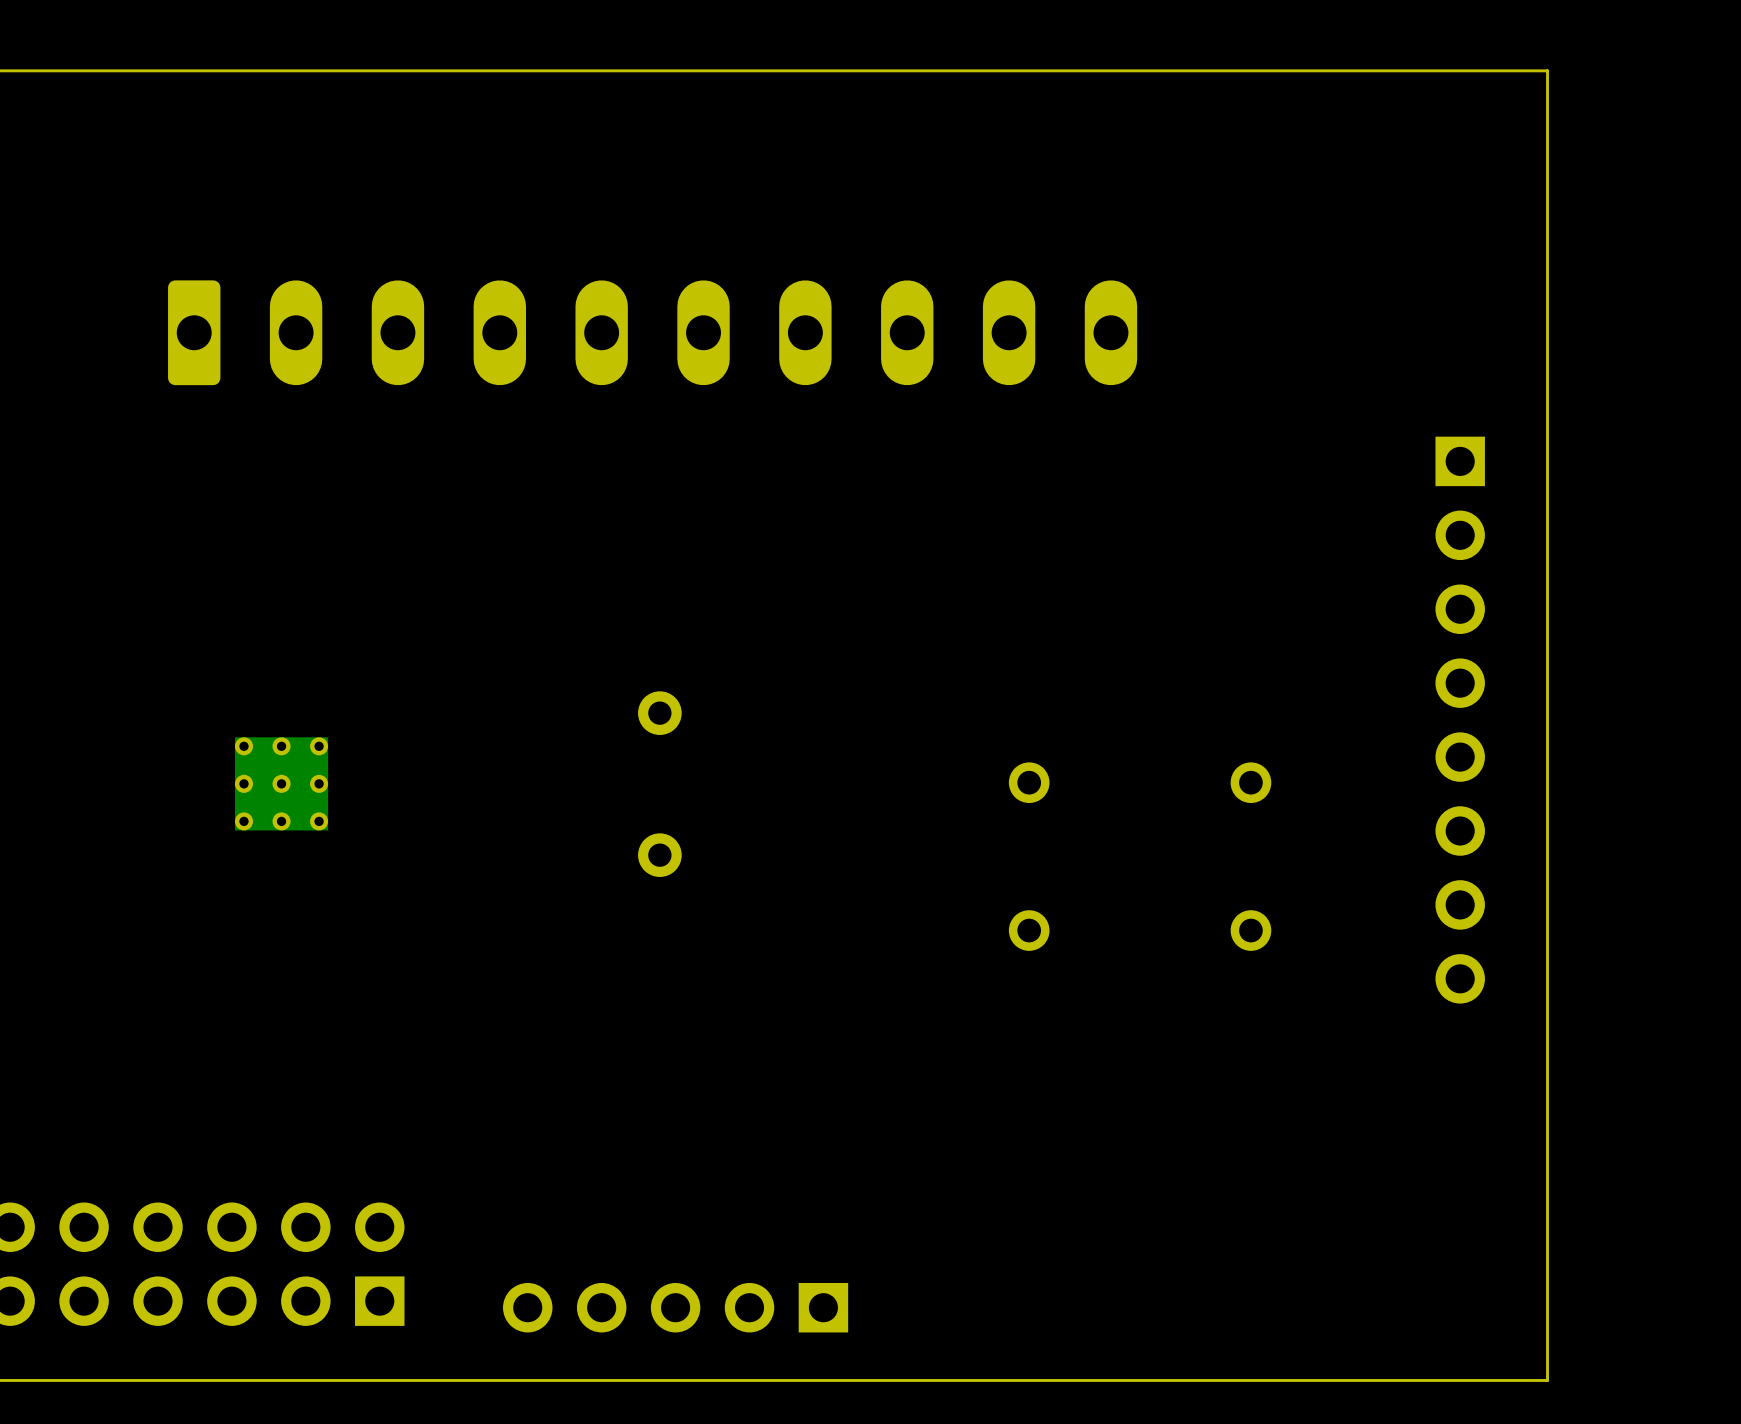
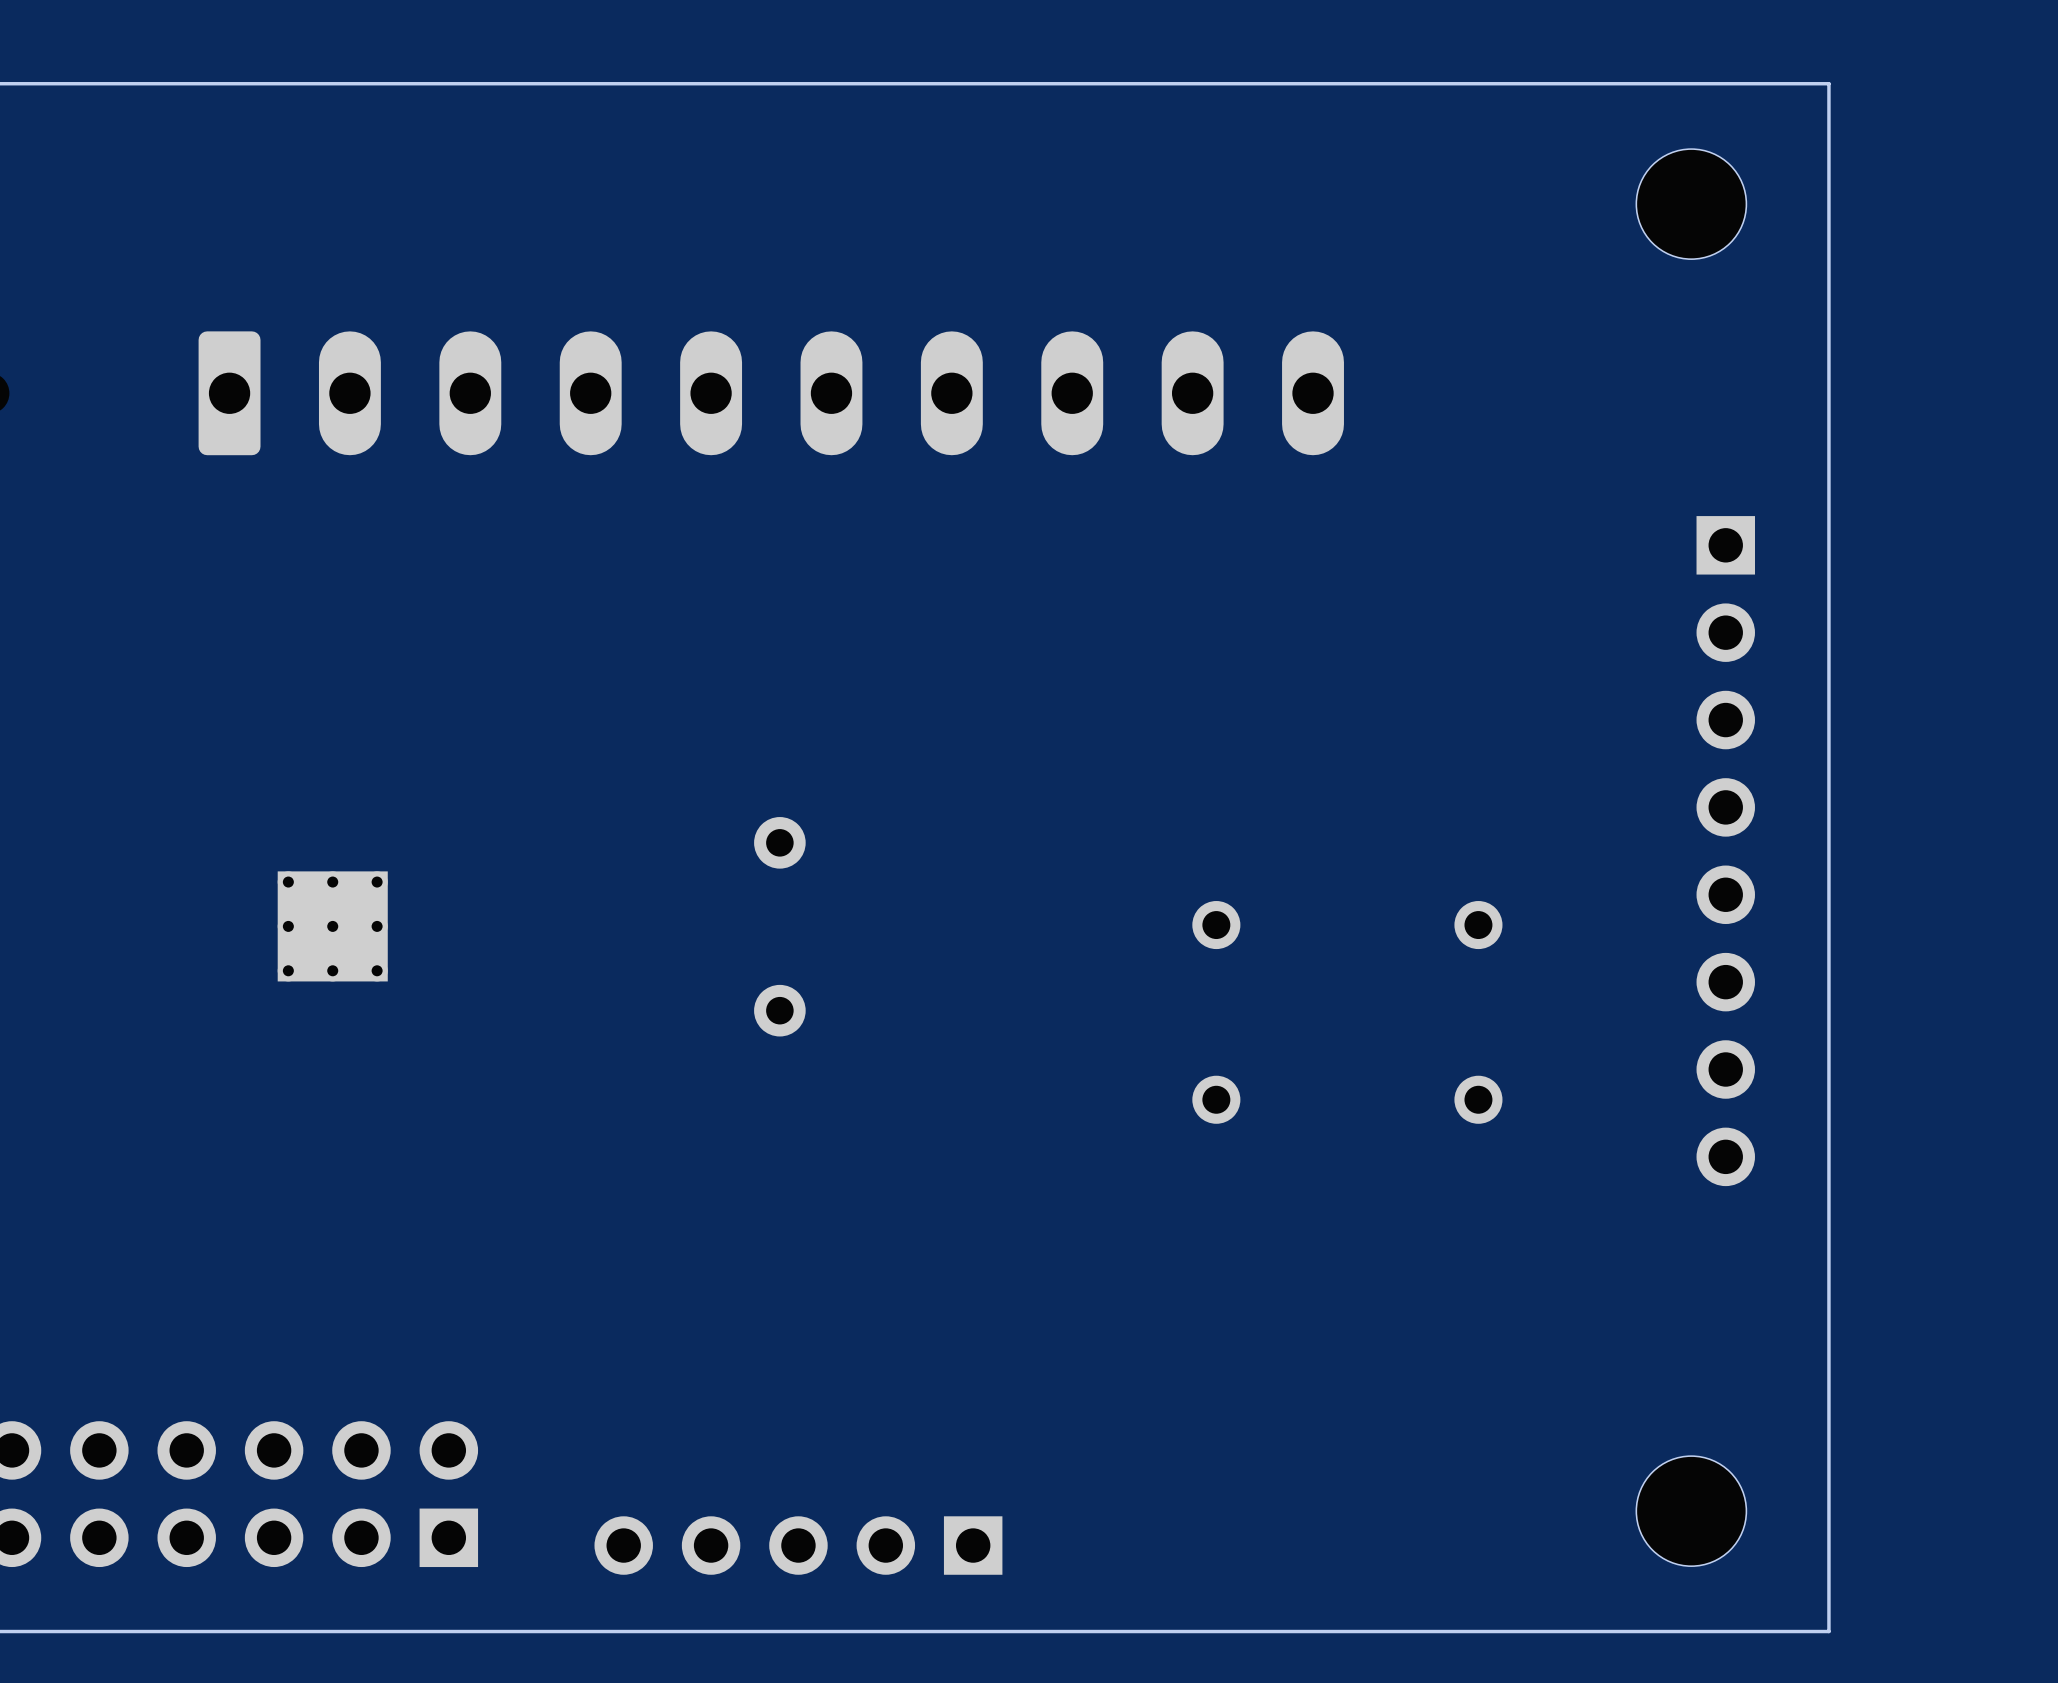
part: none -> (1691, 204)
part: none -> (1691, 1511)

